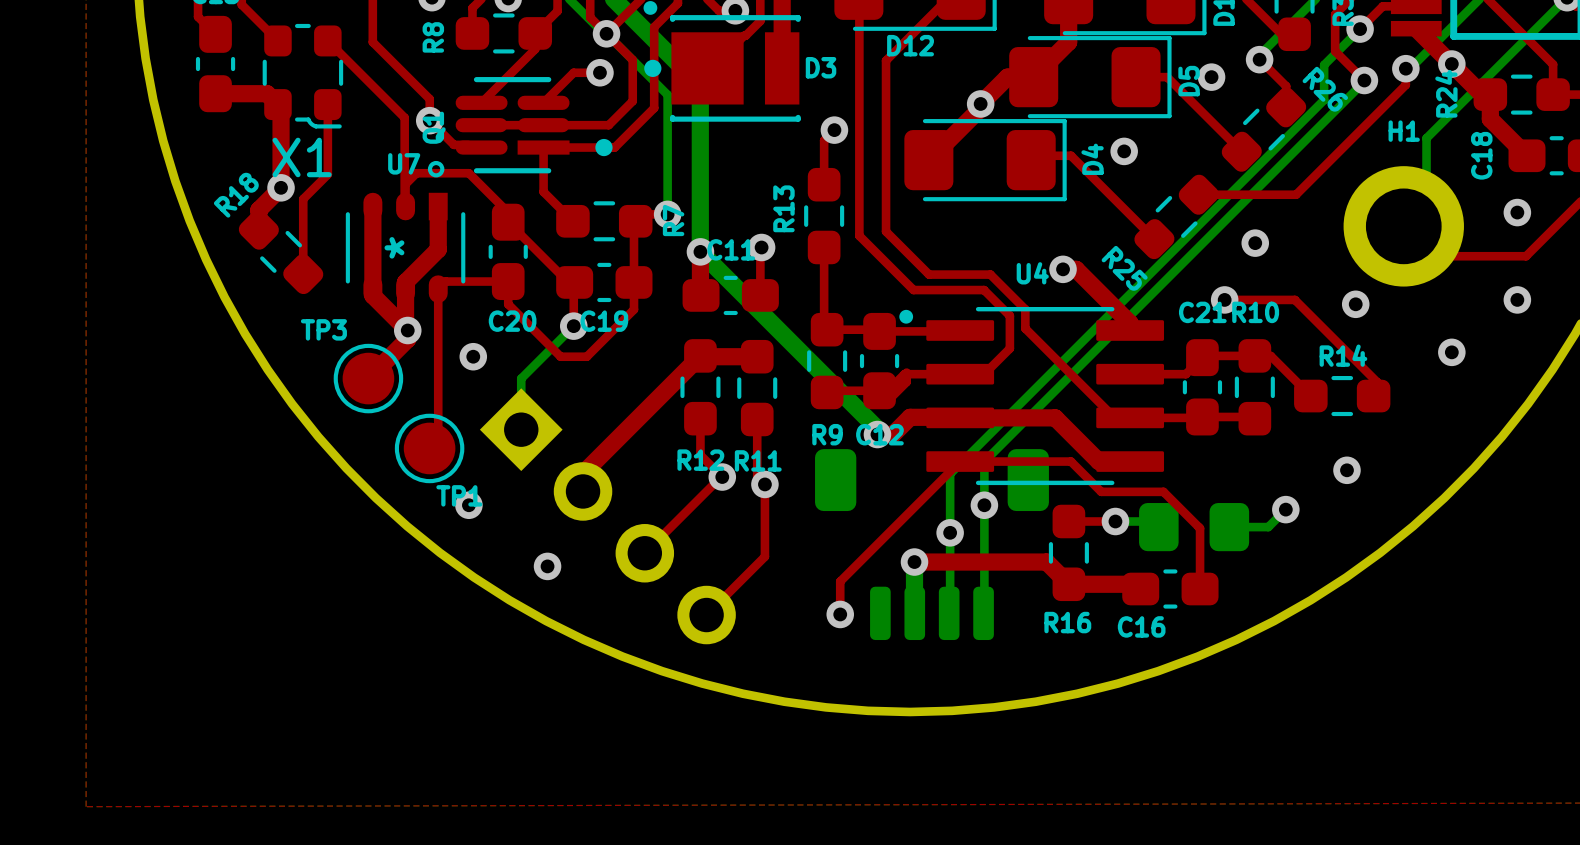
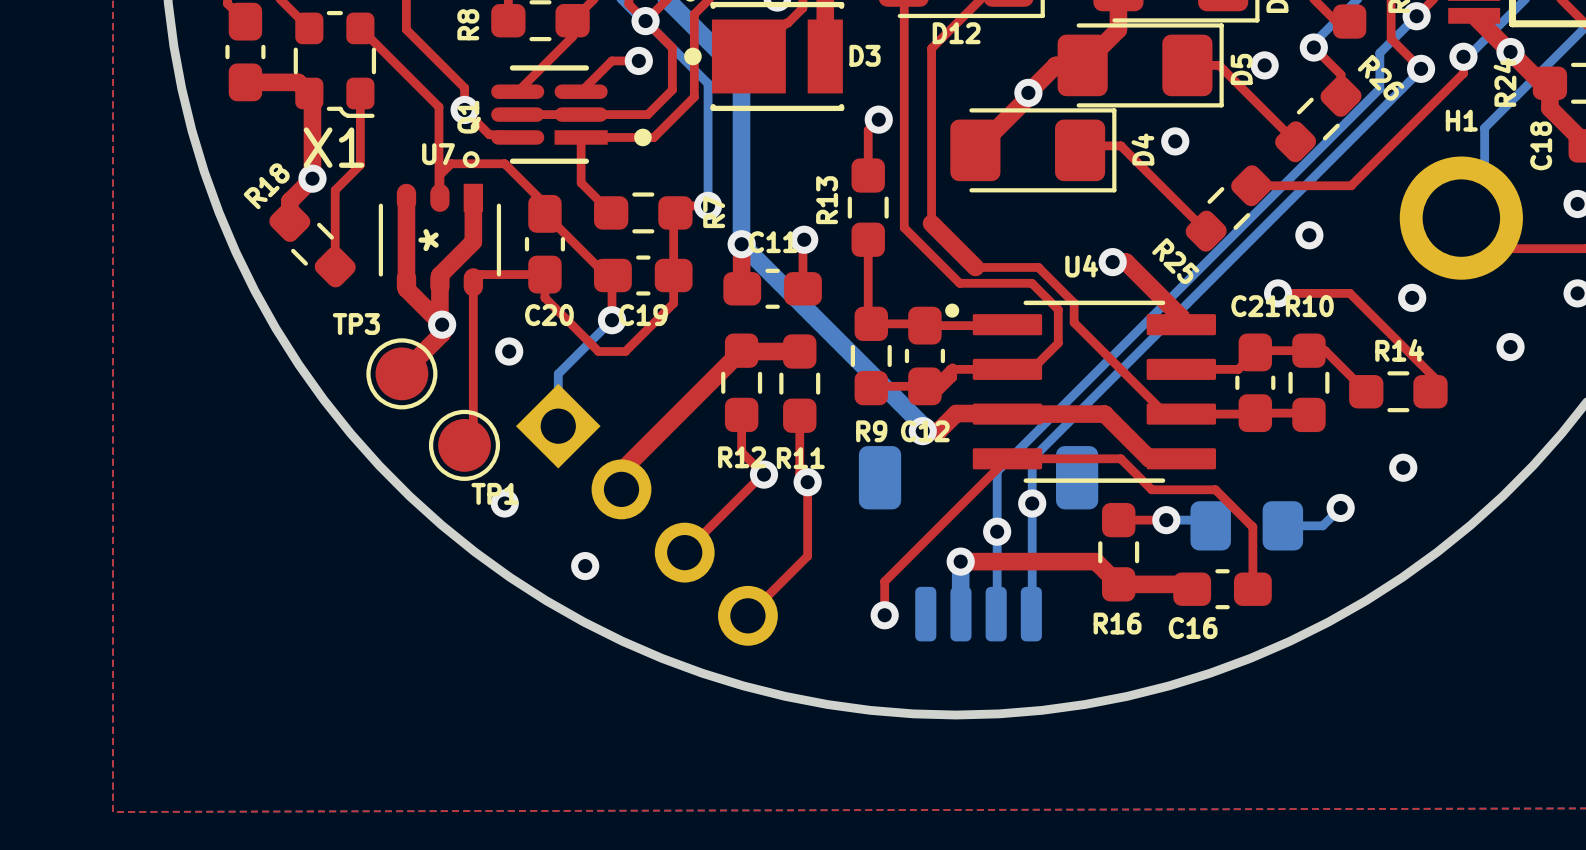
top track width: thin (886, 231) (929, 274) -> thick (931, 223) (975, 267)

